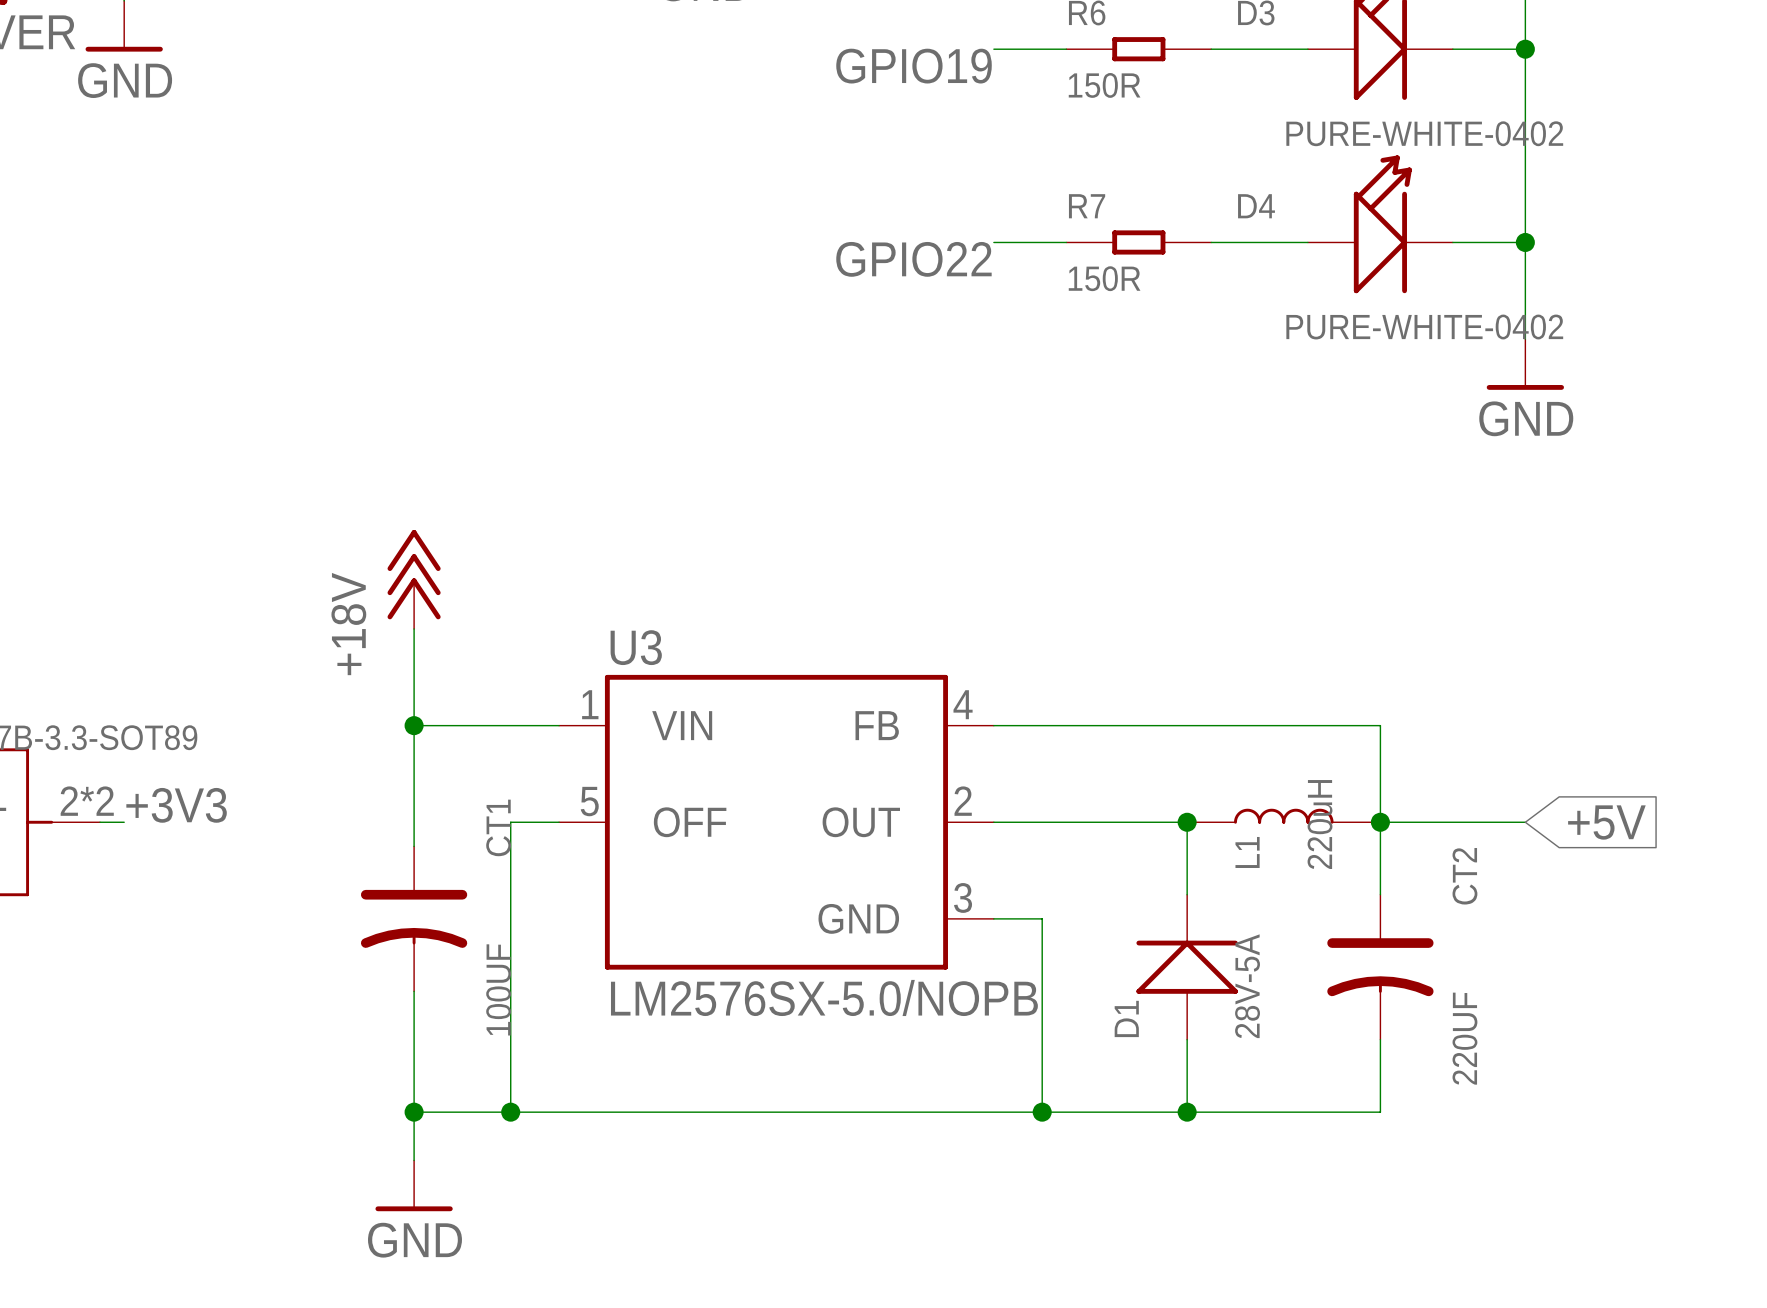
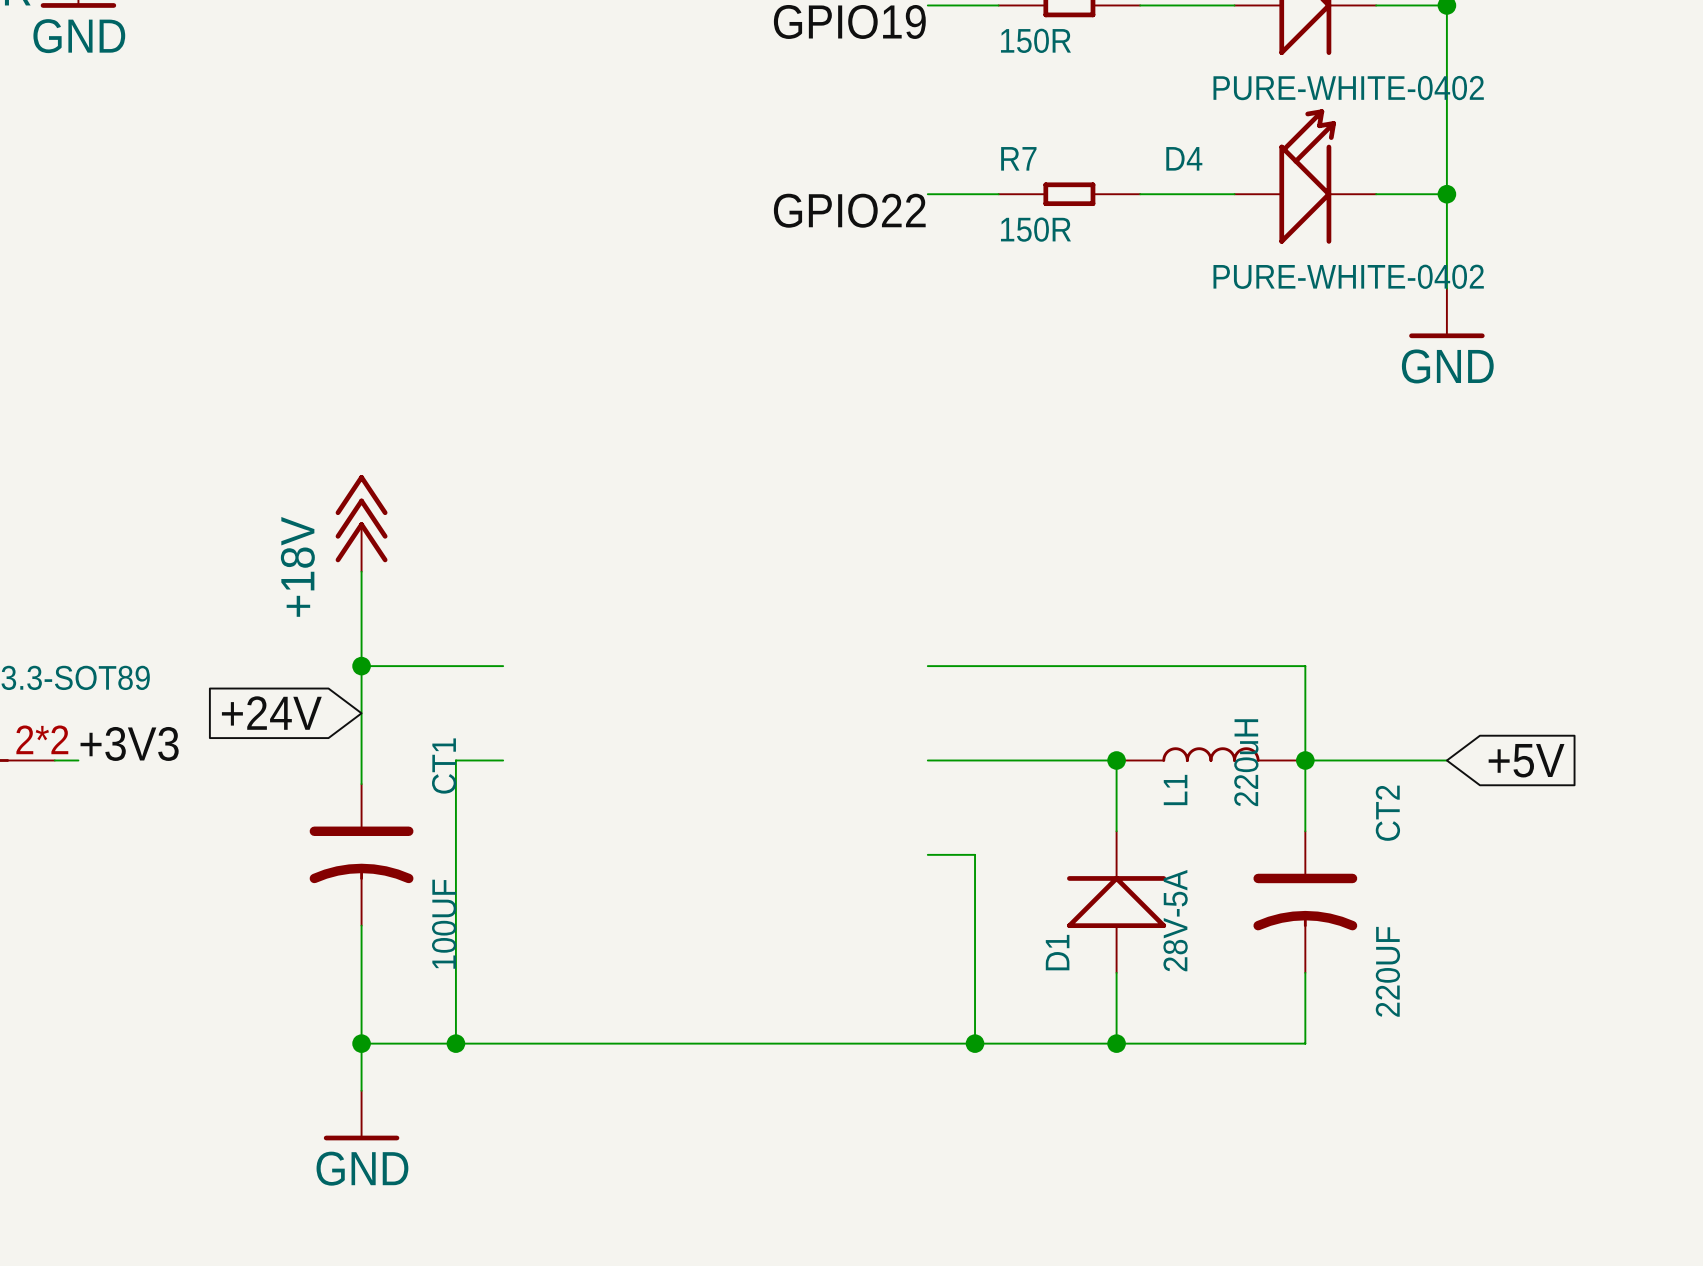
global label: none -> +24V (271, 713)
U3: LM2576SX-5.0/NOPB (776, 822) -> none

